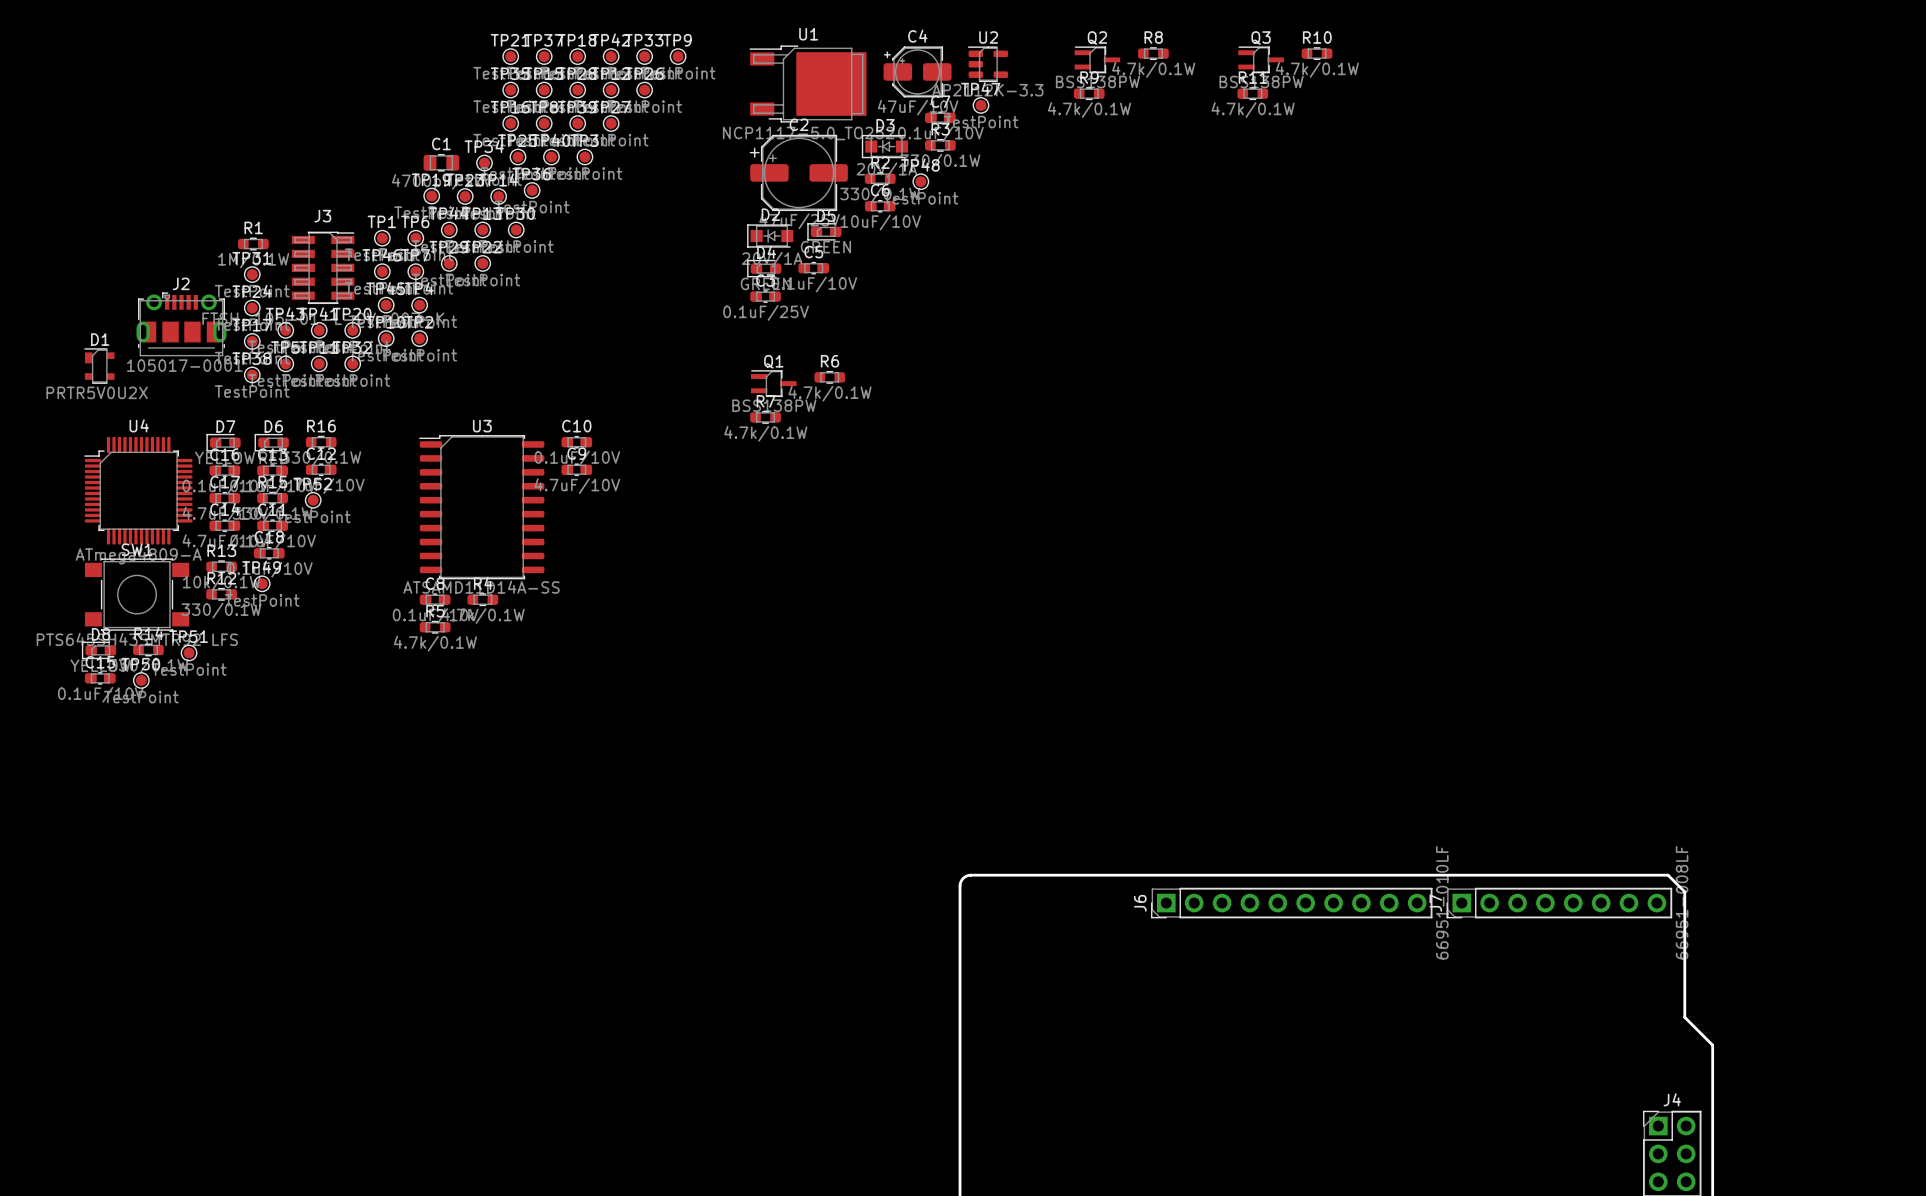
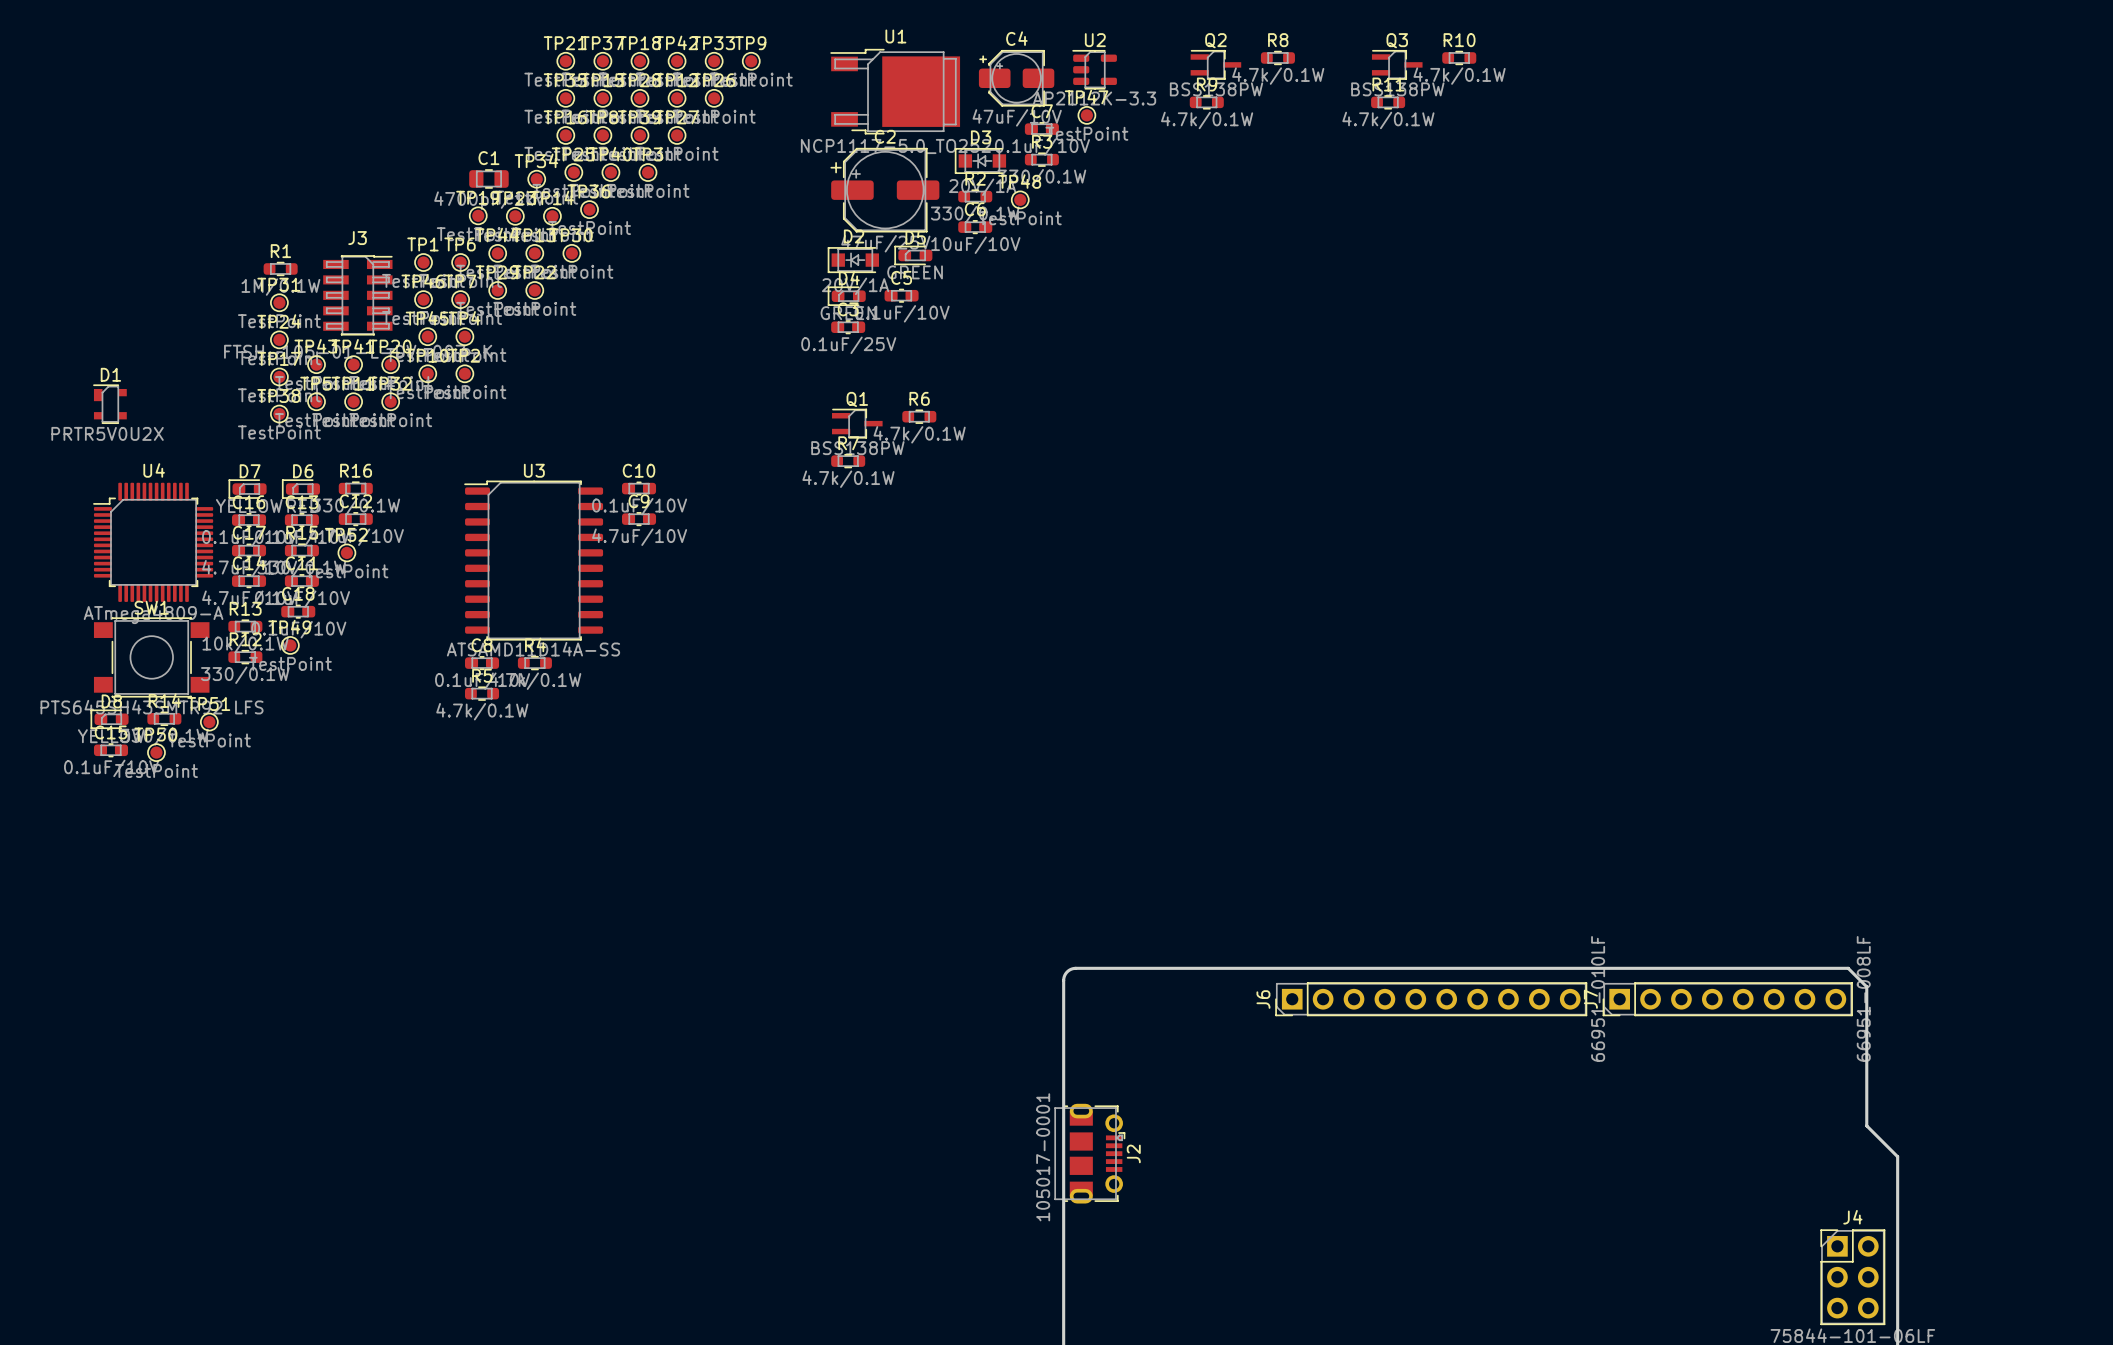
J2 rotation: 0° (181, 324) -> 90° clockwise (1089, 1153)
J2 position: (181, 324) -> (1089, 1153)

